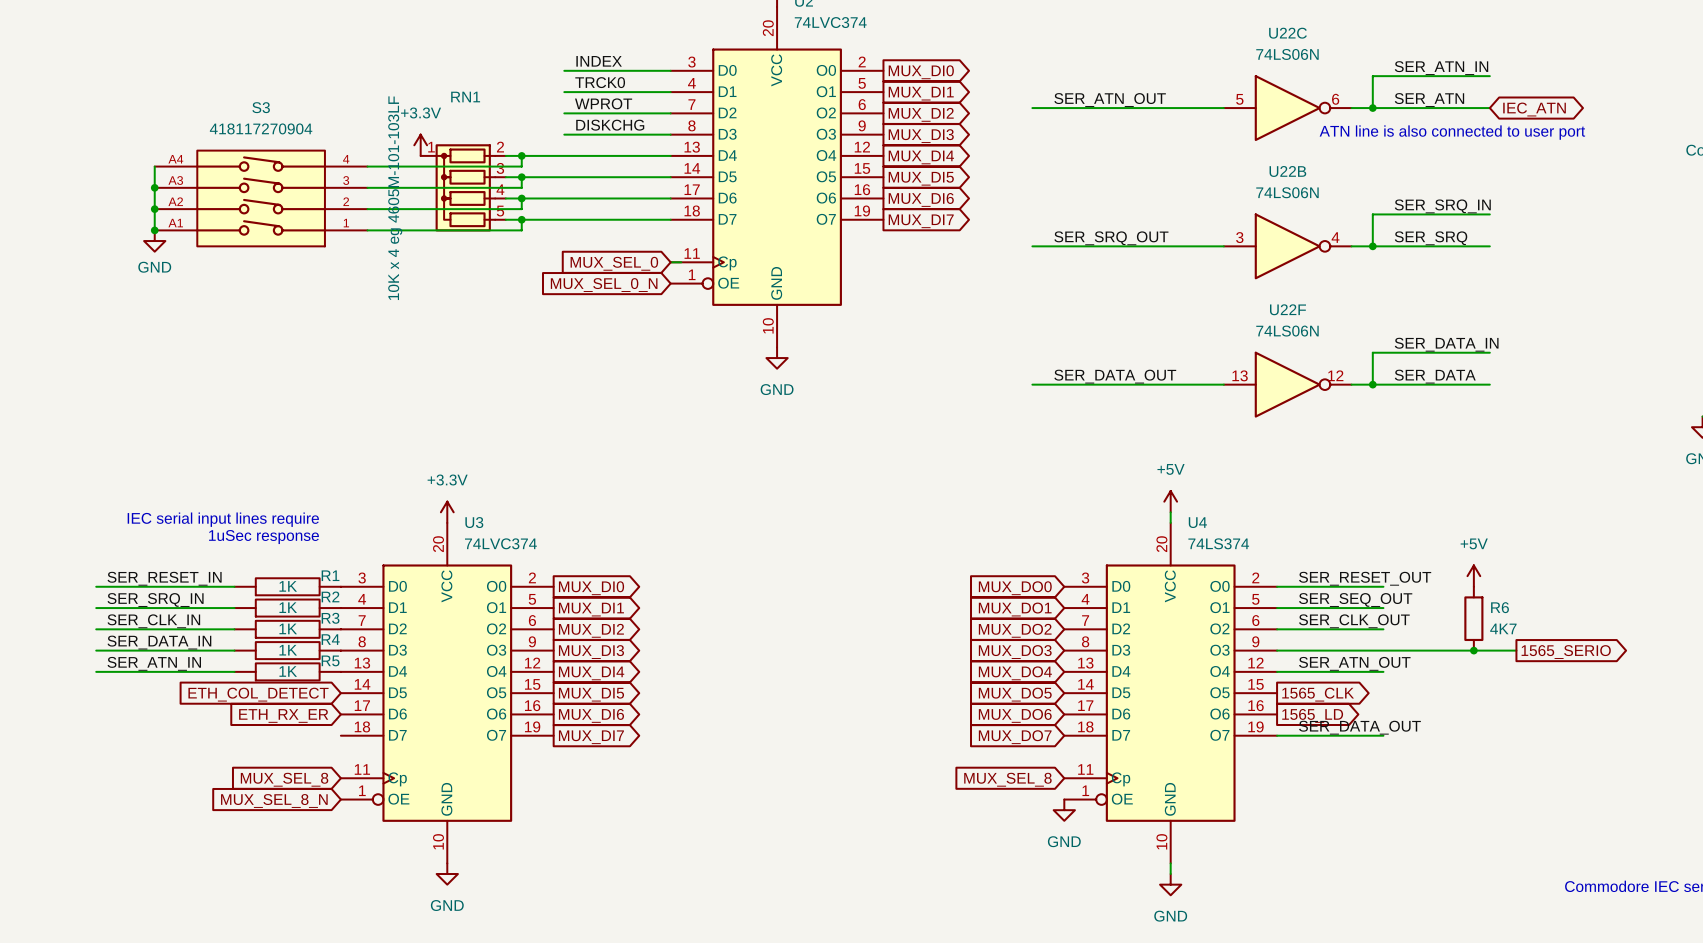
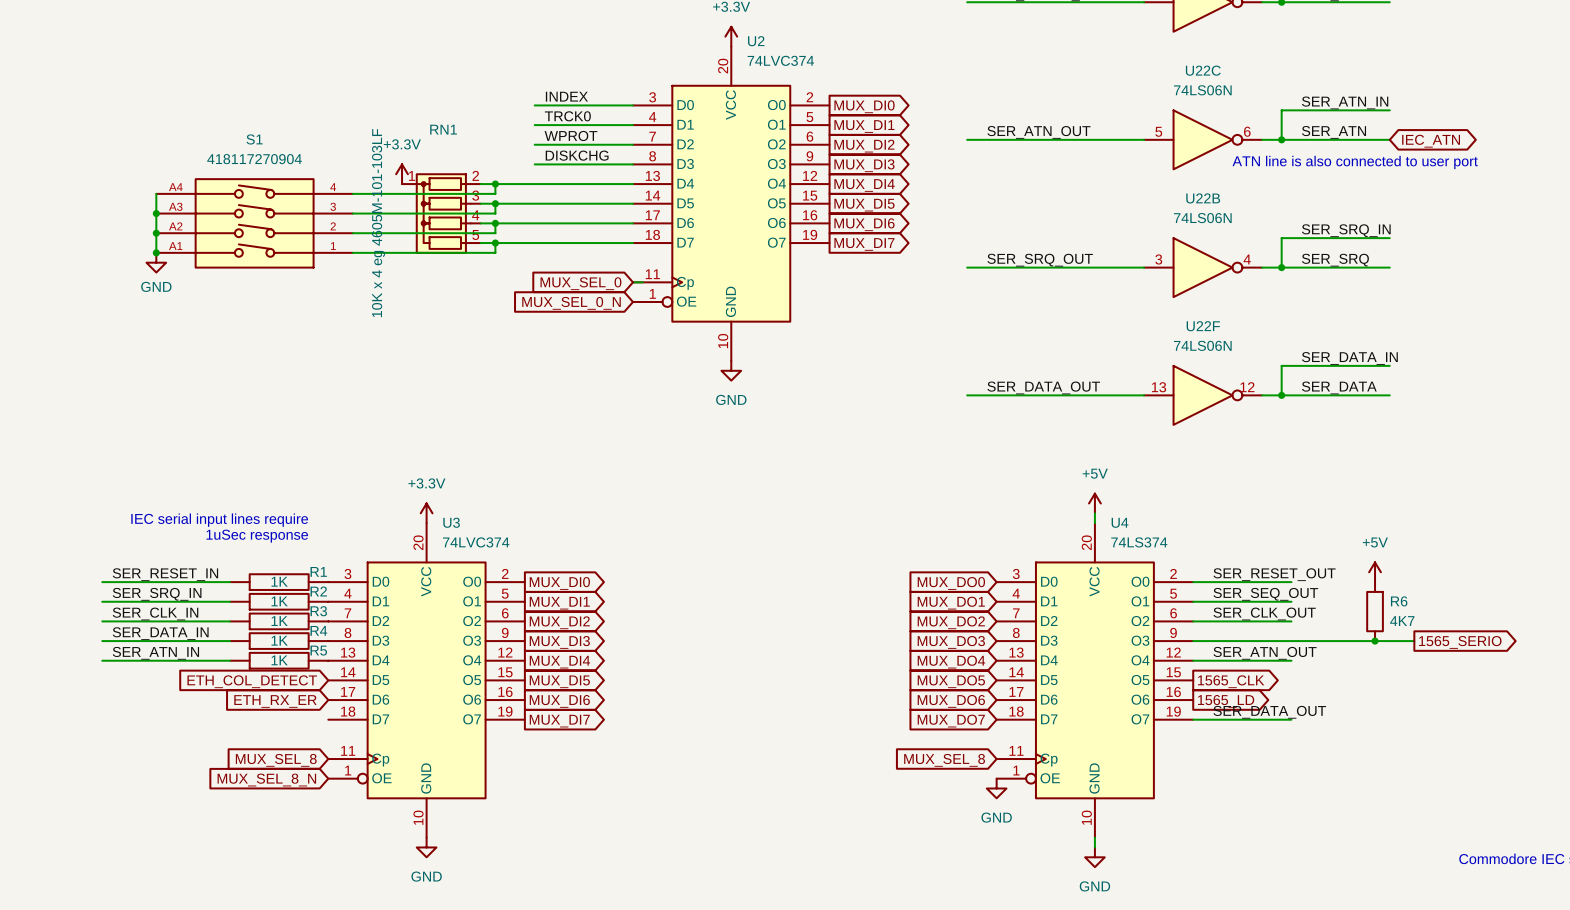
S3 name: S3 (261, 107) -> S1 (254, 139)

